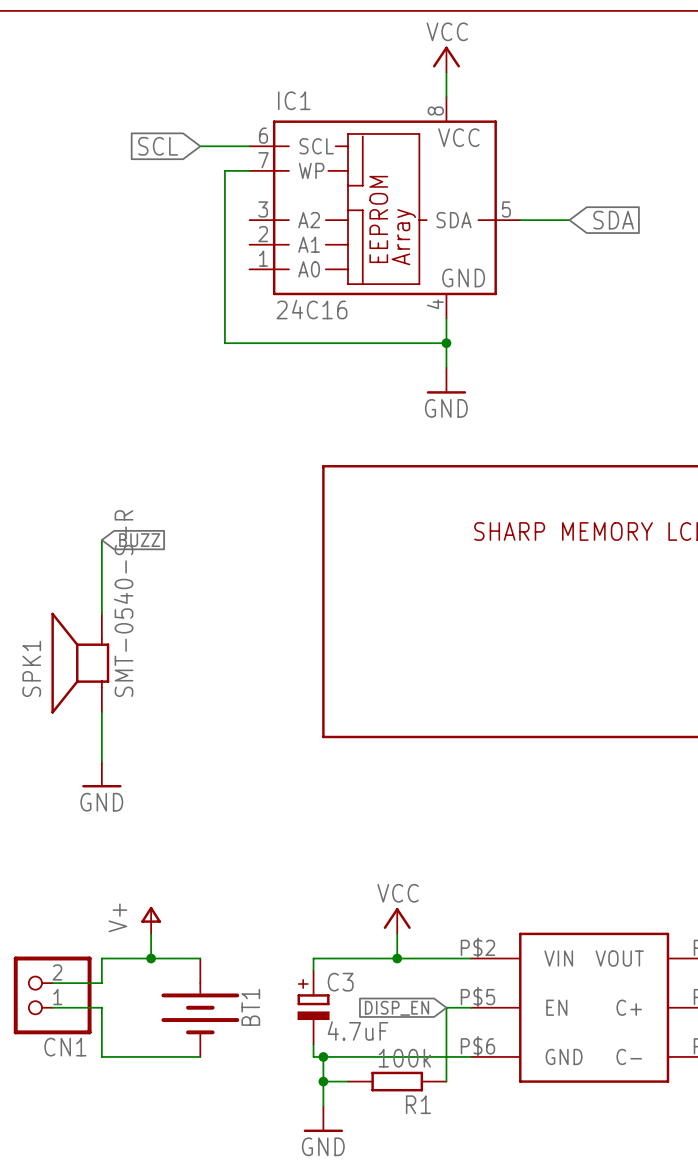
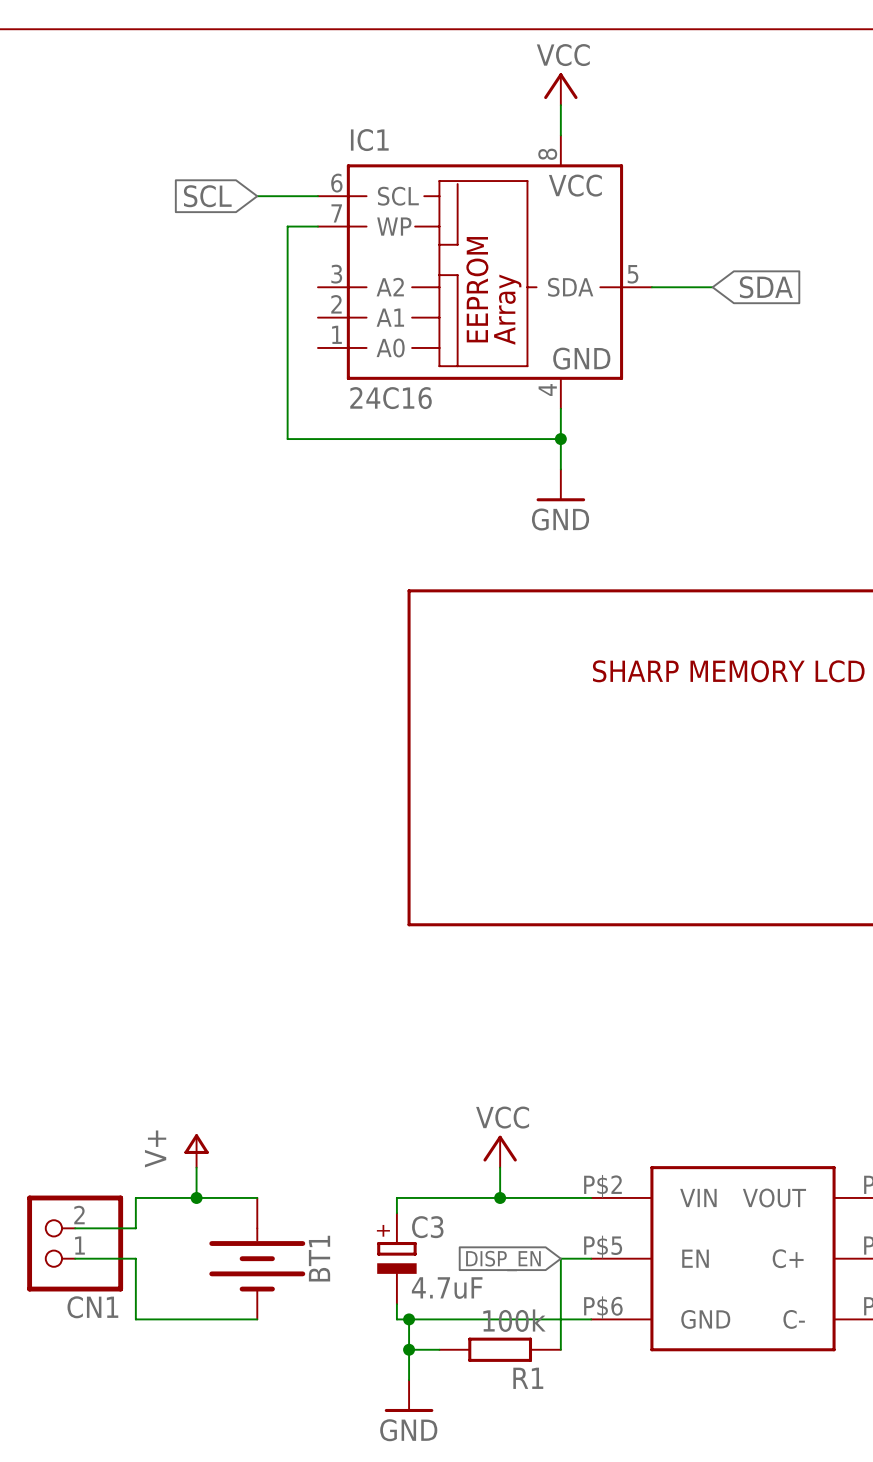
wire: (101, 540) (101, 613) -> none
global label: BUZZ (139, 540) -> none
SPK1: SMT-0540-S-R (80, 663) -> none
wire: (101, 712) (101, 761) -> none
power symbol: GND (101, 774) -> none

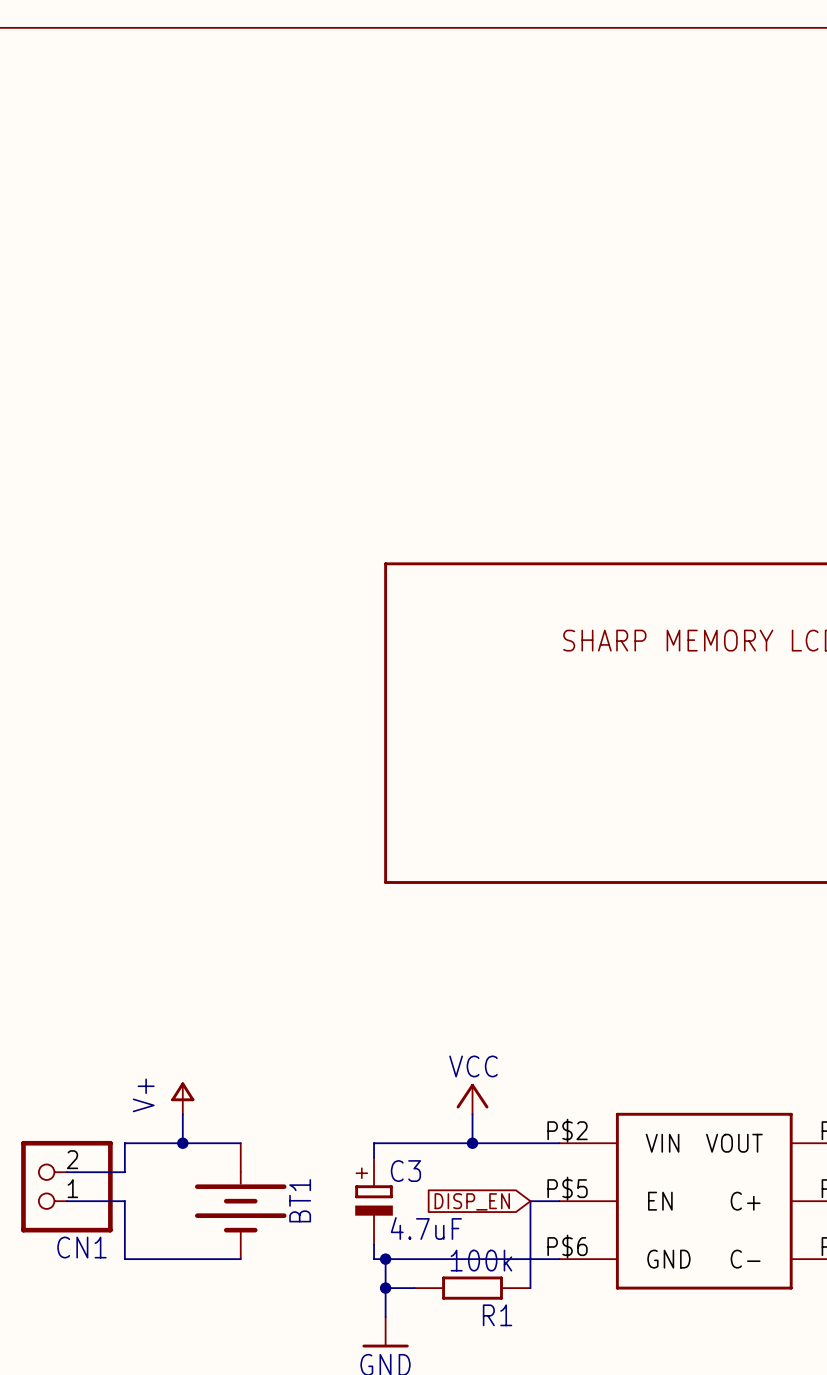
power symbol: VCC (560, 89) -> none
wire: (560, 105) (560, 135) -> none
global label: SCL (207, 196) -> none
wire: (257, 196) (317, 196) -> none
wire: (317, 226) (287, 226) (287, 439) (560, 439) -> none
IC1: 24C16 (484, 272) -> none
wire: (651, 287) (712, 287) -> none
global label: SDA (766, 287) -> none
wire: (560, 408) (560, 469) -> none
junction: (560, 439) -> none
power symbol: GND (560, 485) -> none

